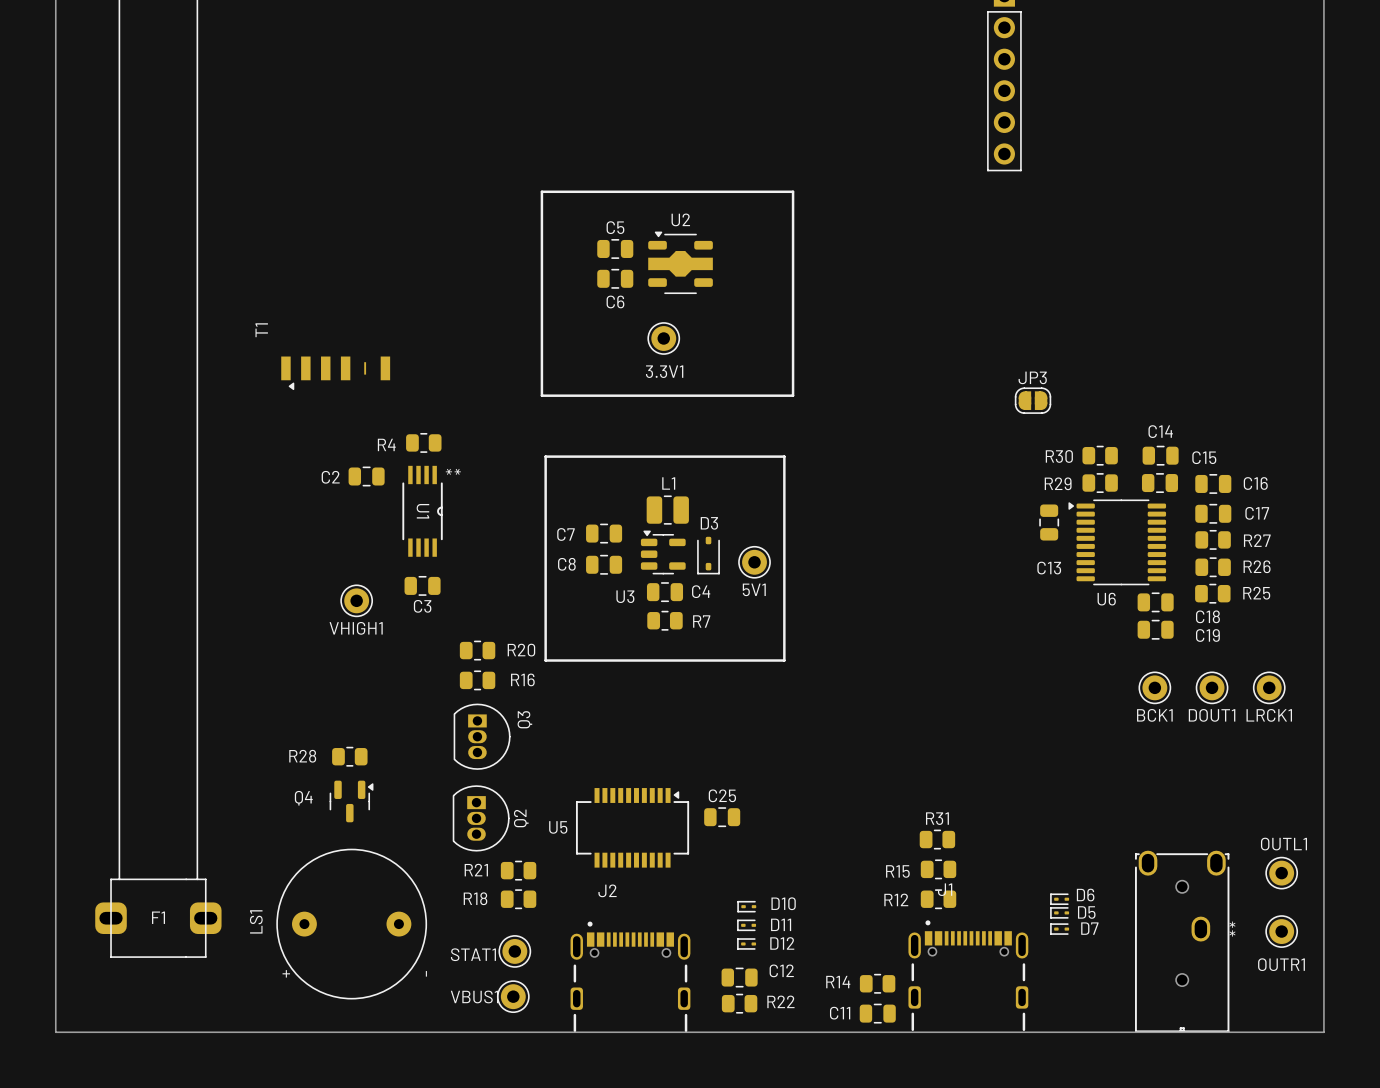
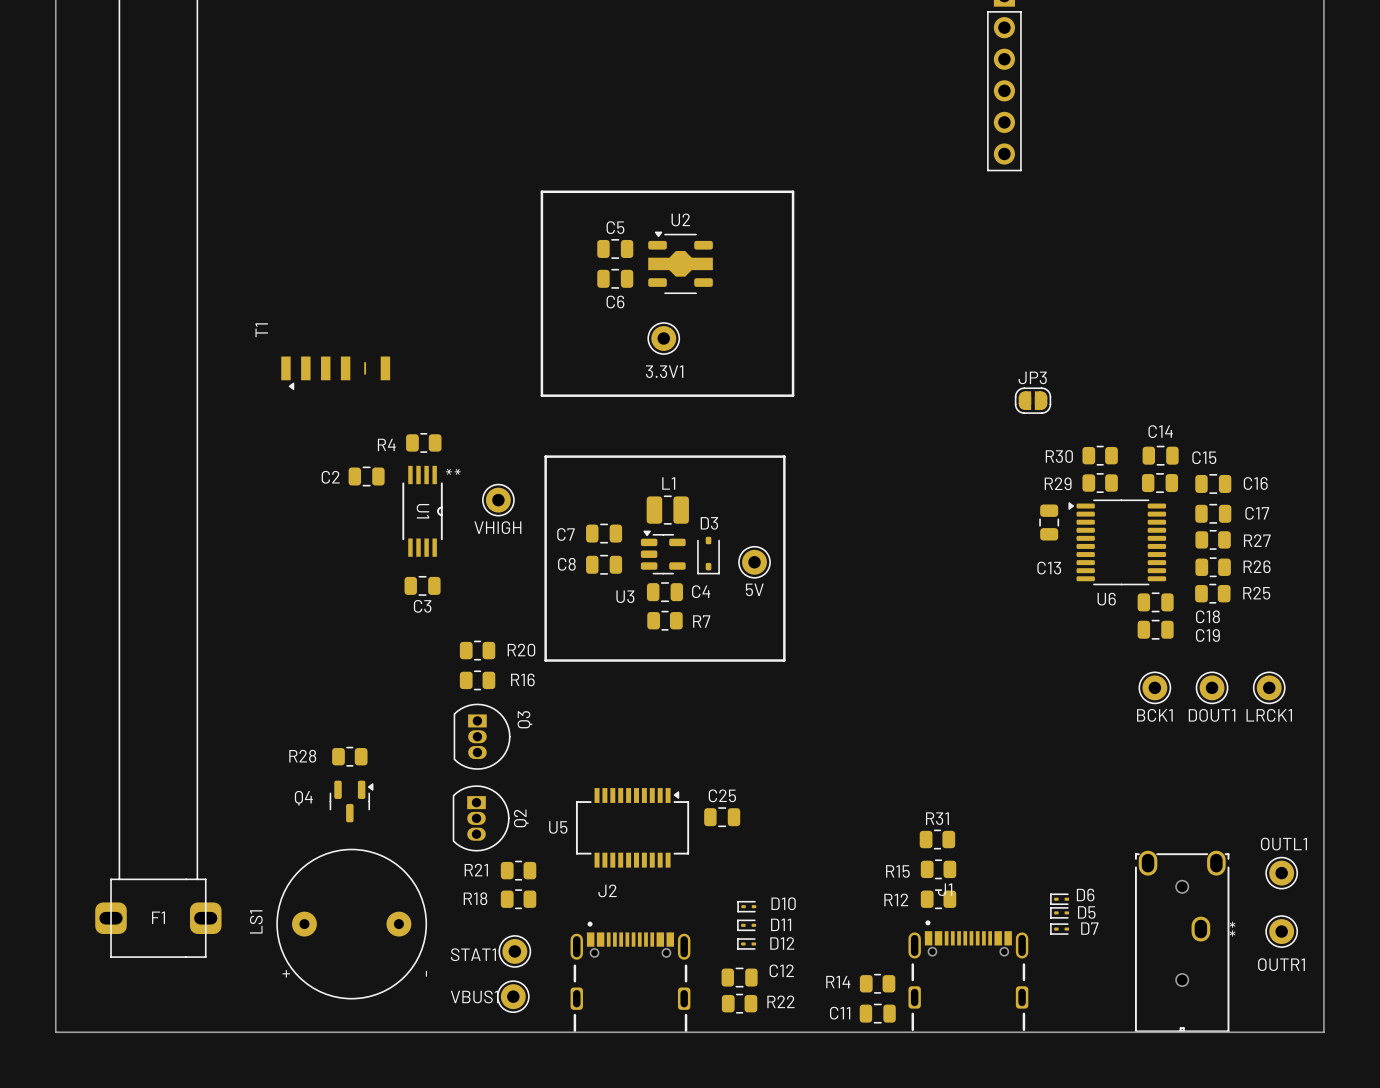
VHIGH: none -> (498, 500)
5V1 name: 5V1 (754, 589) -> 5V (754, 589)
VHIGH1: (356, 600) -> none

